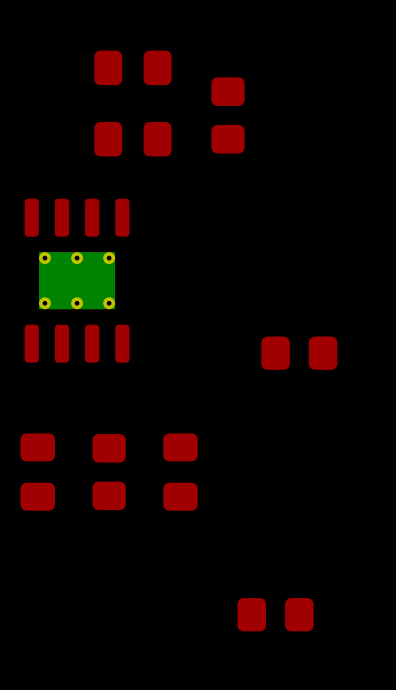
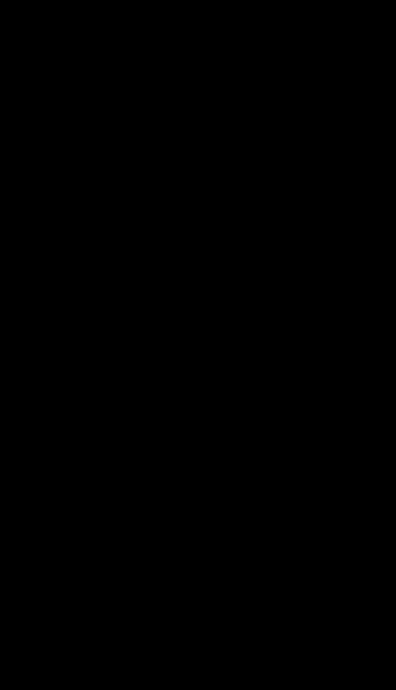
part: (132, 67) -> none
part: (228, 115) -> none
part: (132, 139) -> none
part: (77, 280) -> none
part: (299, 353) -> none
part: (37, 472) -> none
part: (109, 472) -> none
part: (180, 472) -> none
part: (275, 614) -> none

